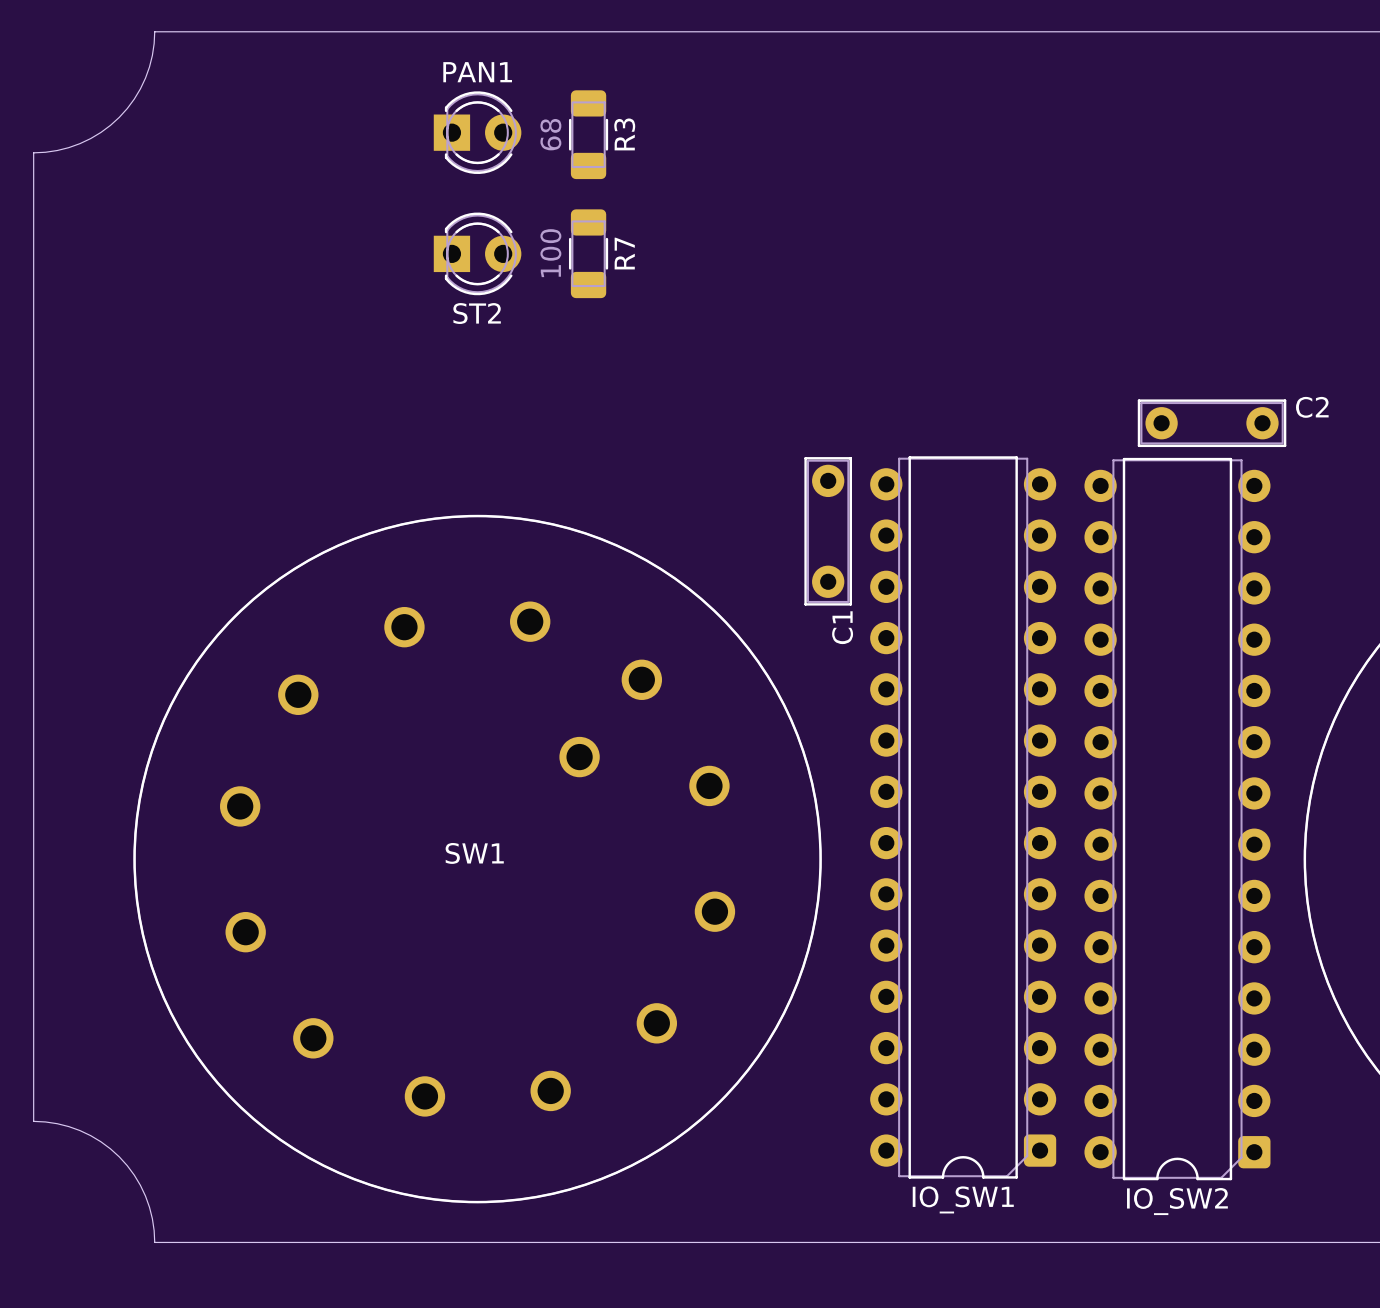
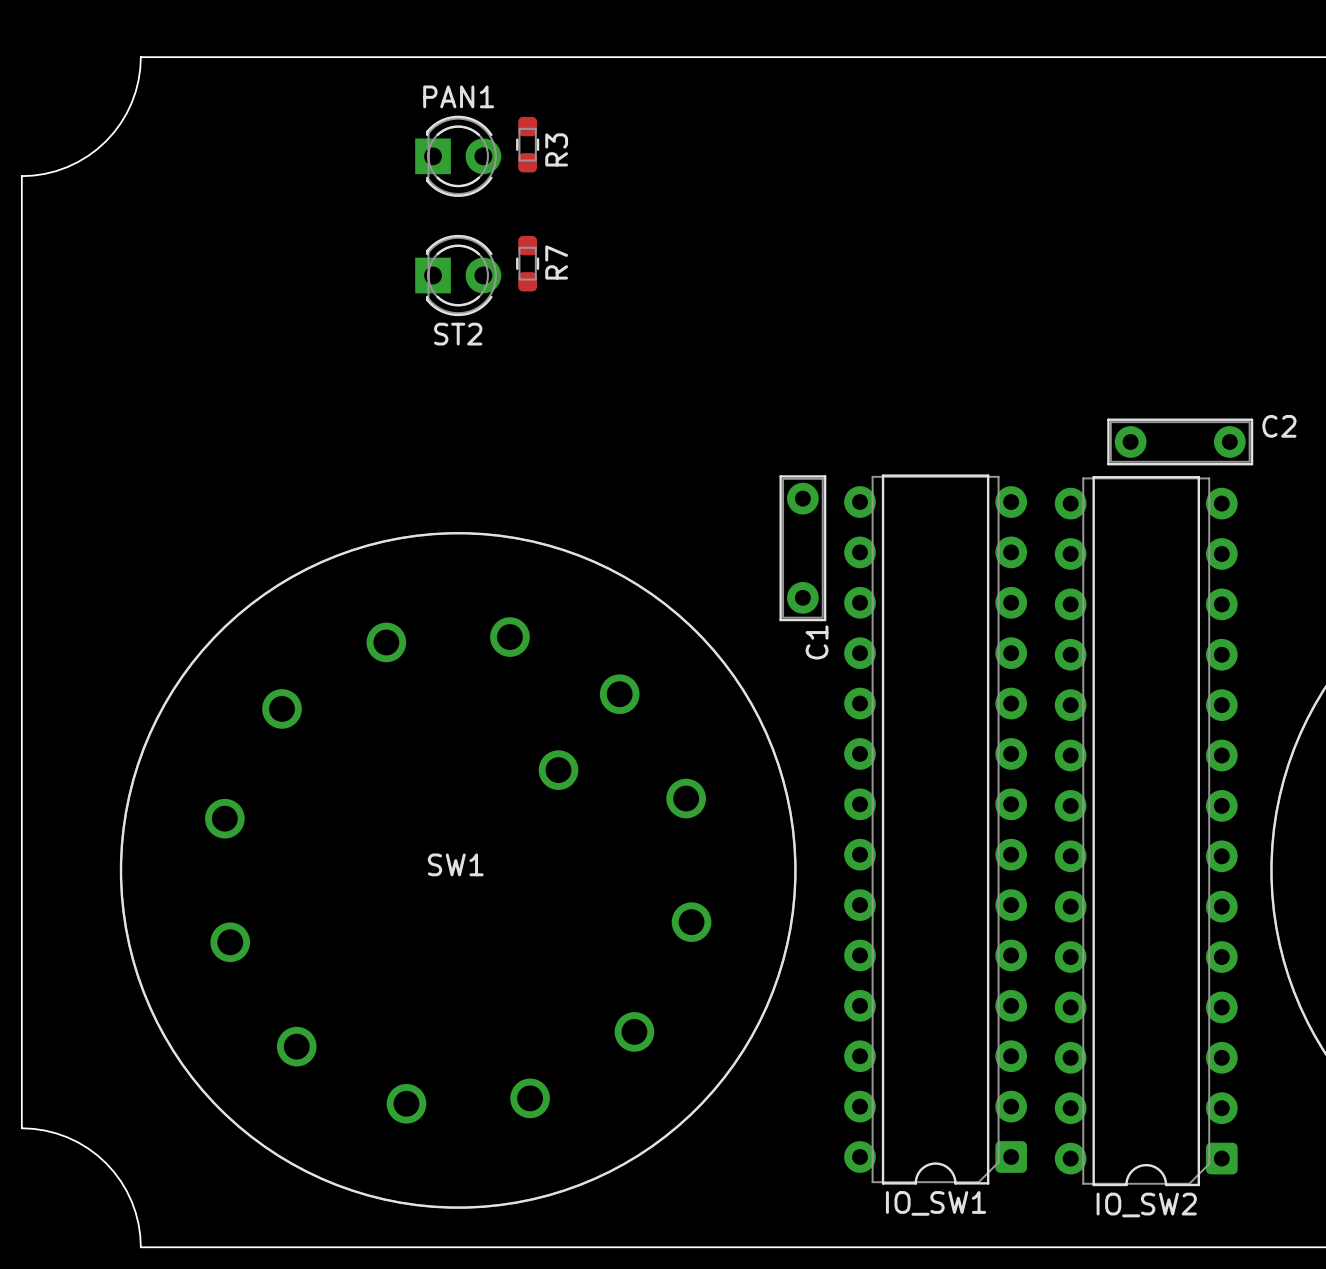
R3 footprint: [568, 90, 609, 180] -> [516, 116, 540, 173]
R3 value: 68 (550, 134) -> none
R7 footprint: [568, 209, 609, 299] -> [516, 235, 540, 292]
R7 value: 100 (550, 253) -> none

